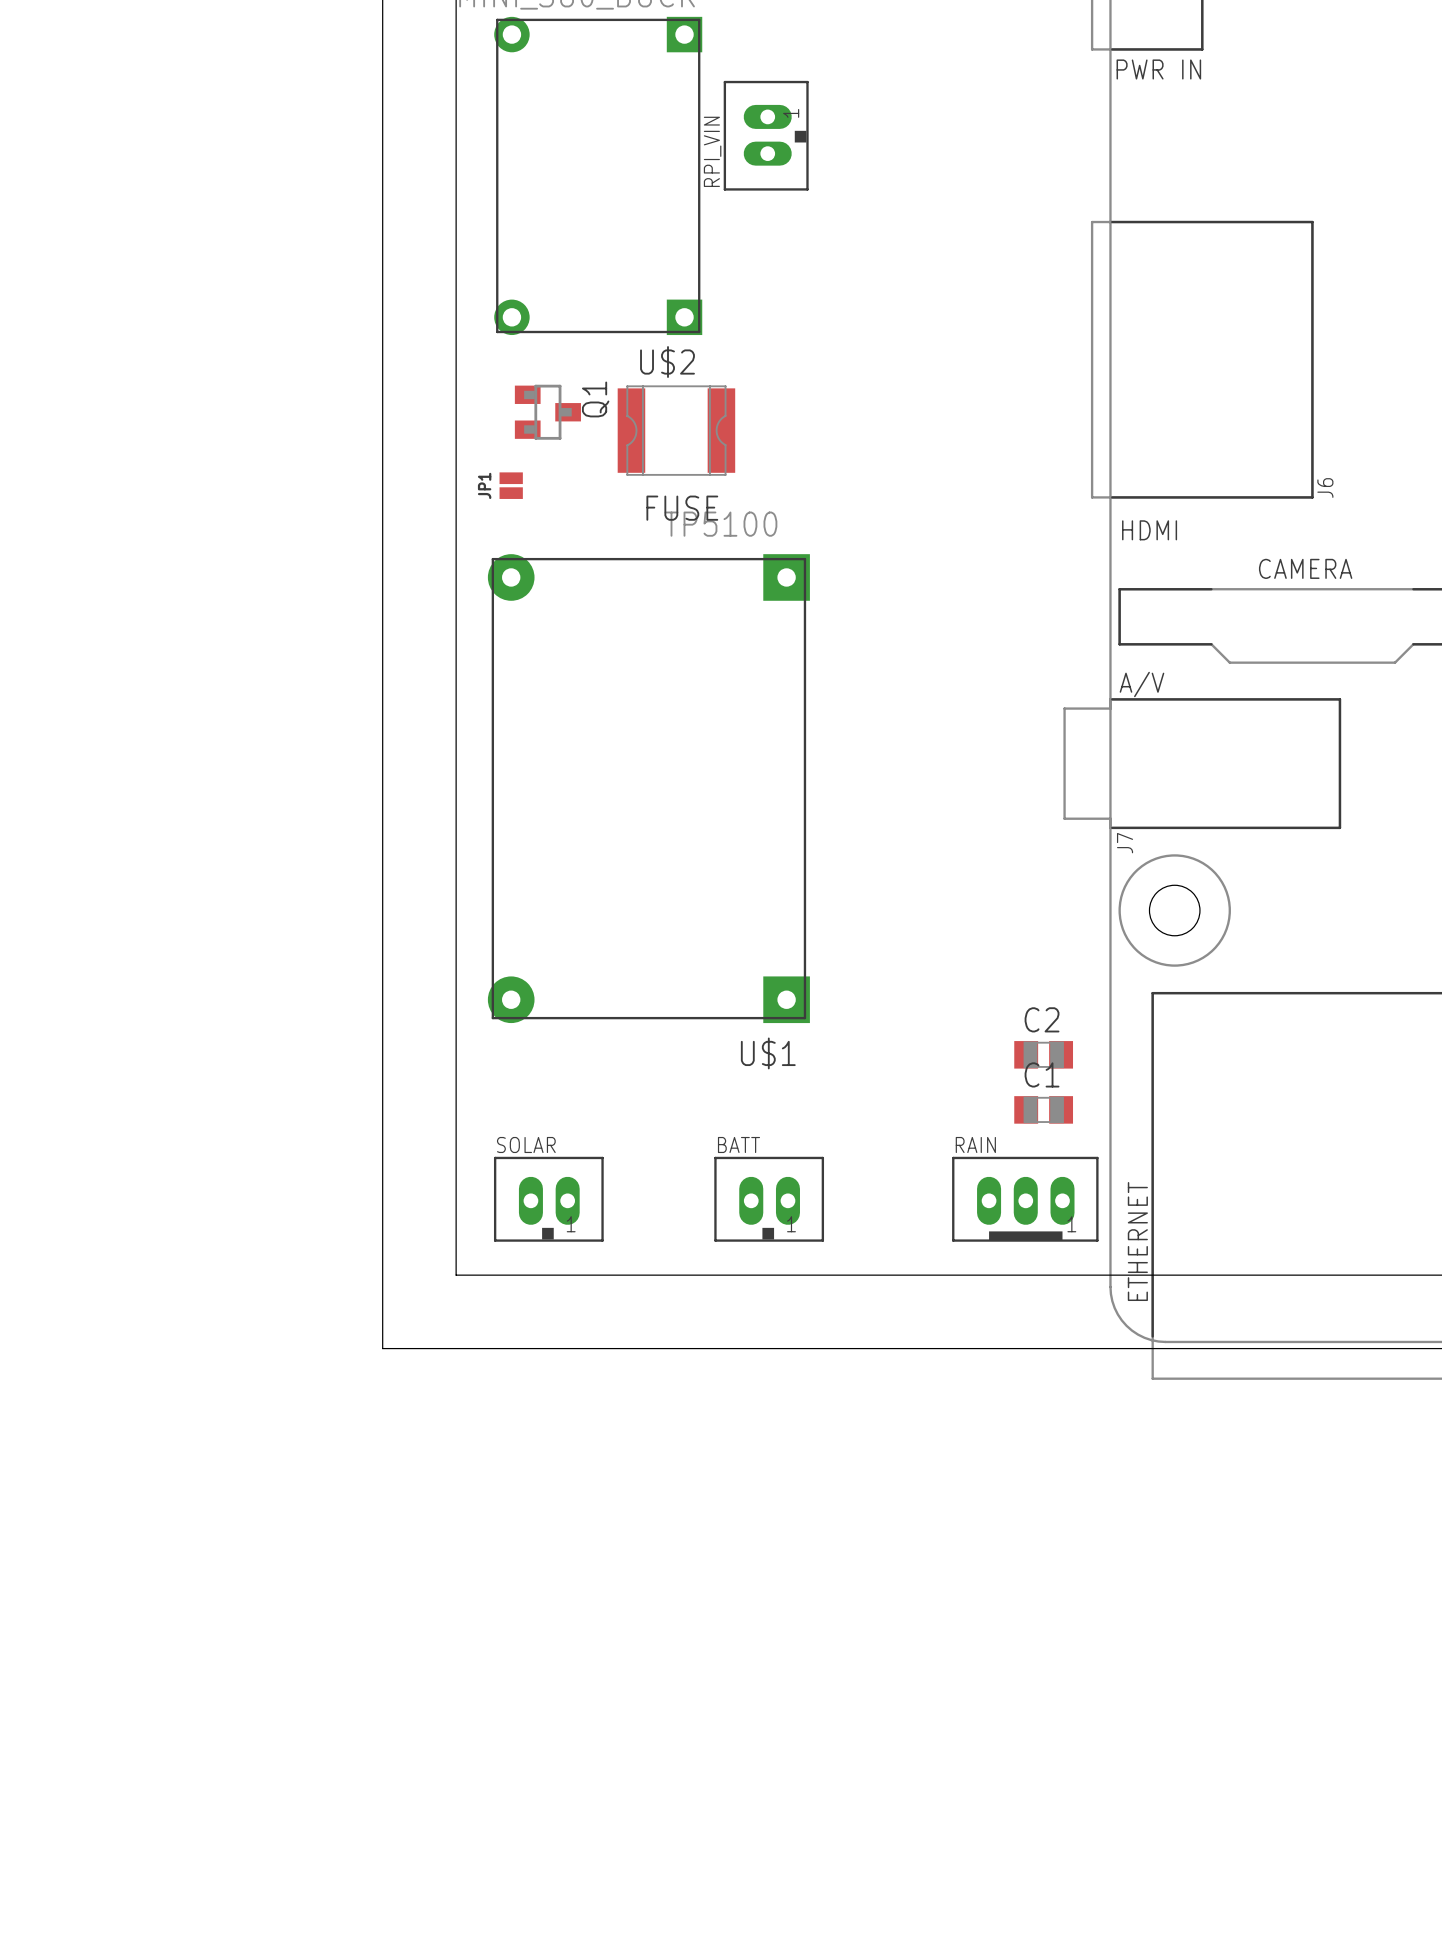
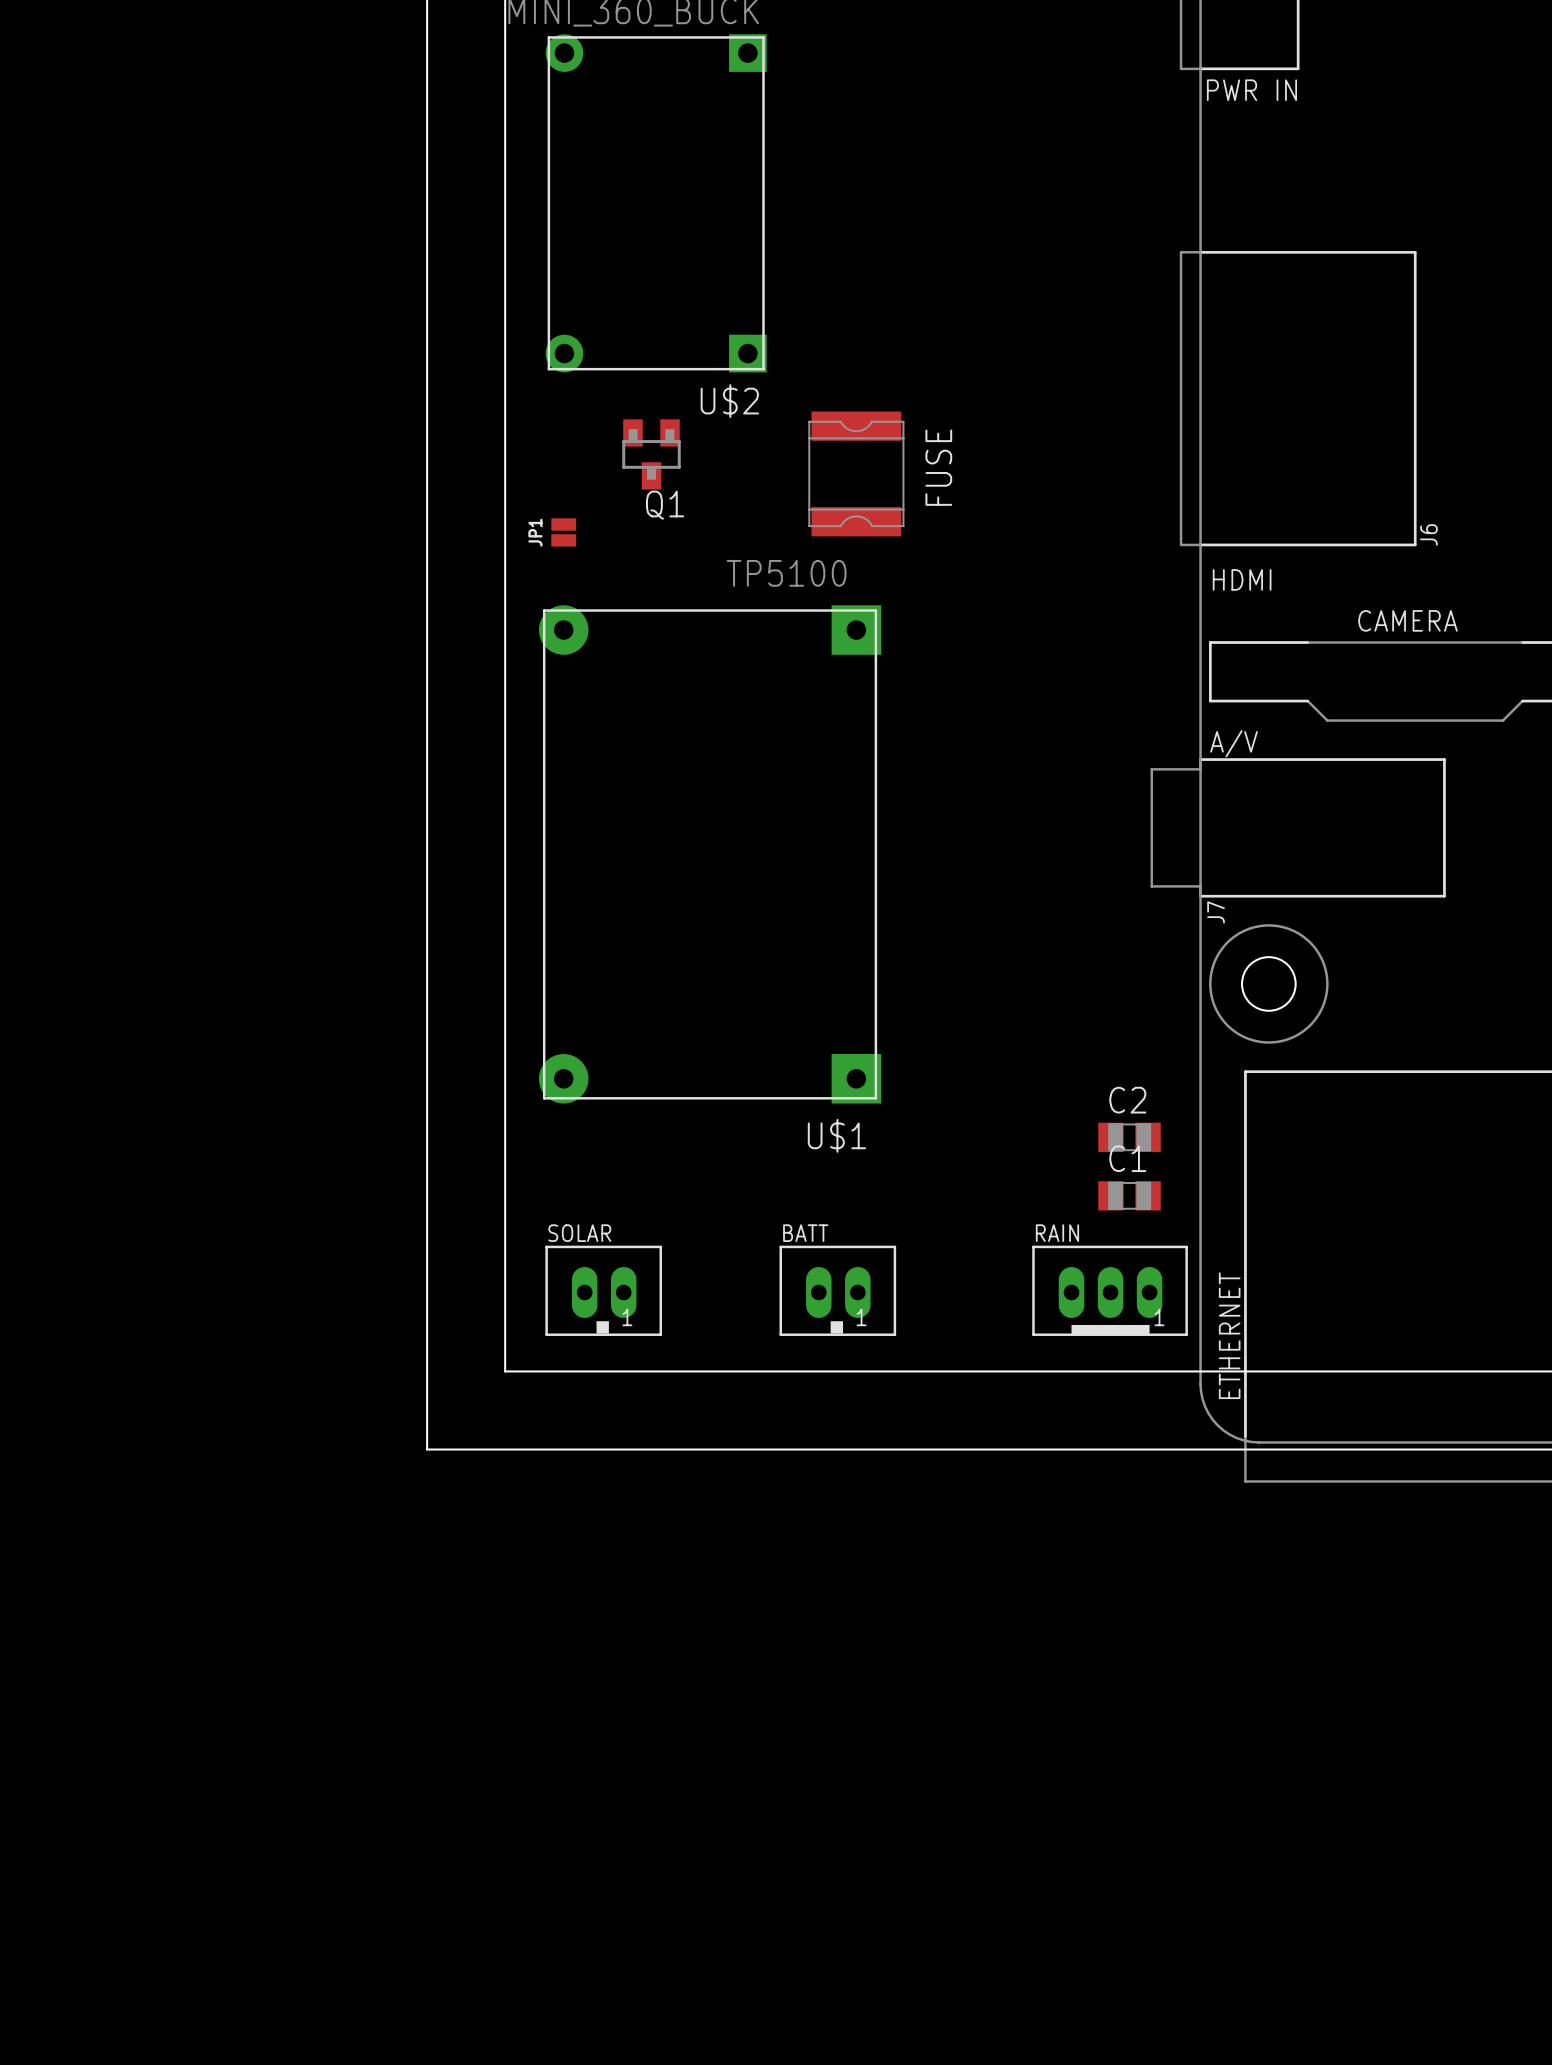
RPI_VIN: (766, 135) -> none
Q1 rotation: 0° (547, 412) -> 90° clockwise (651, 454)
Q1 position: (547, 412) -> (651, 454)
FUSE rotation: 0° (676, 430) -> 90° counterclockwise (856, 473)
FUSE position: (676, 430) -> (856, 473)

